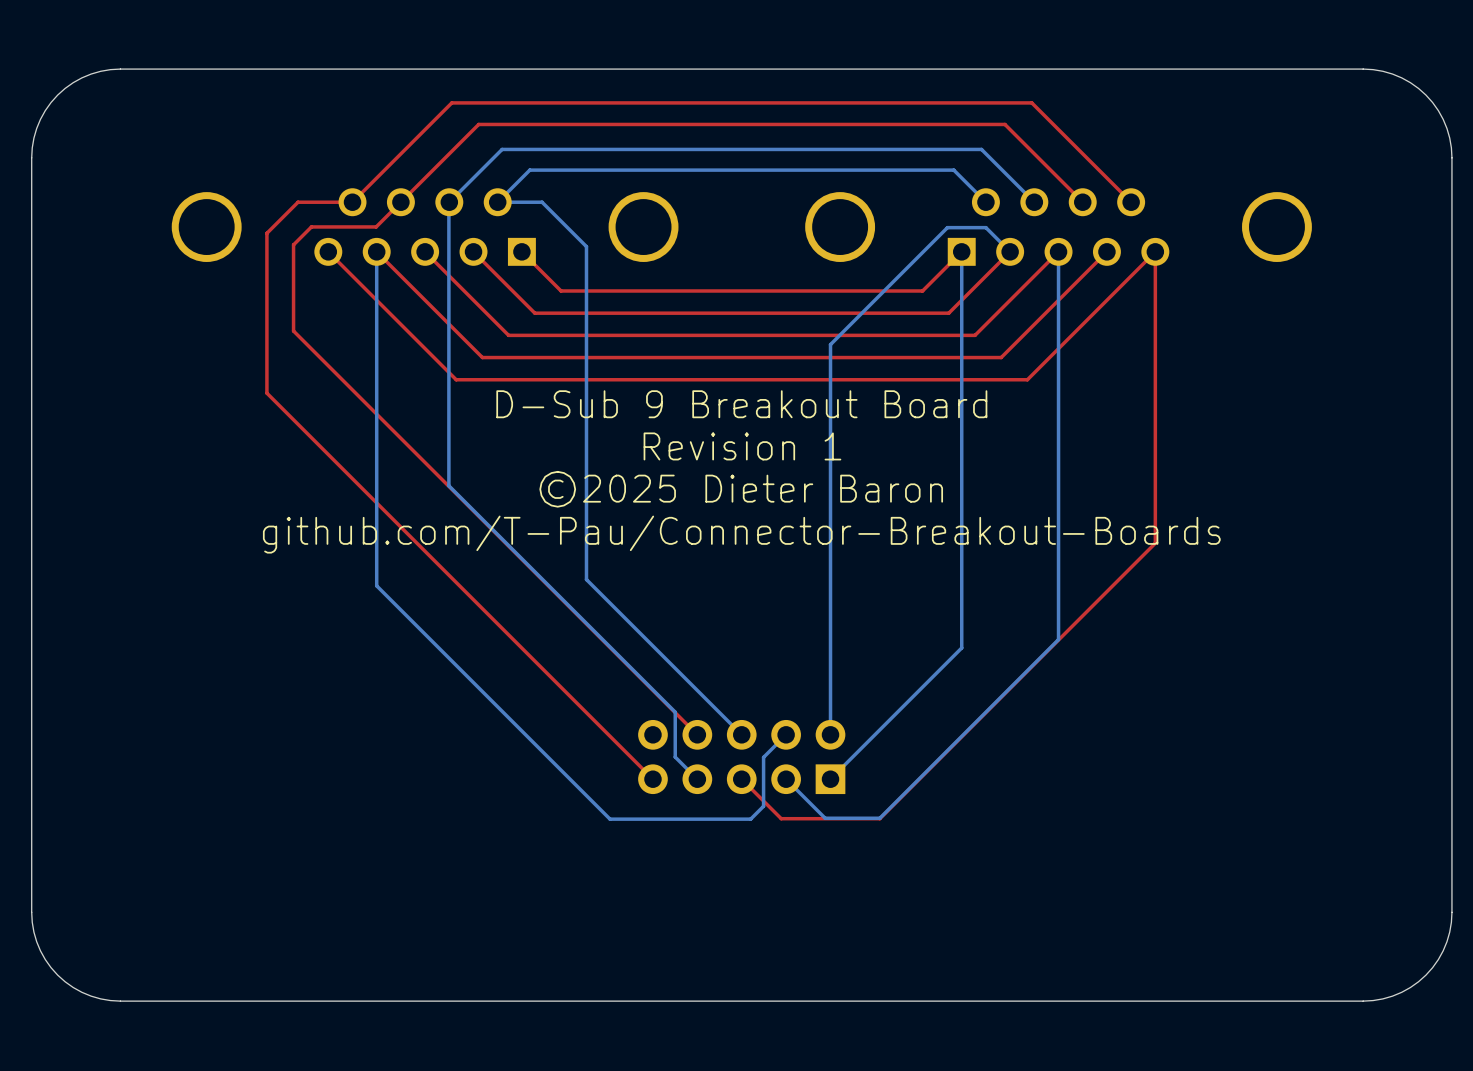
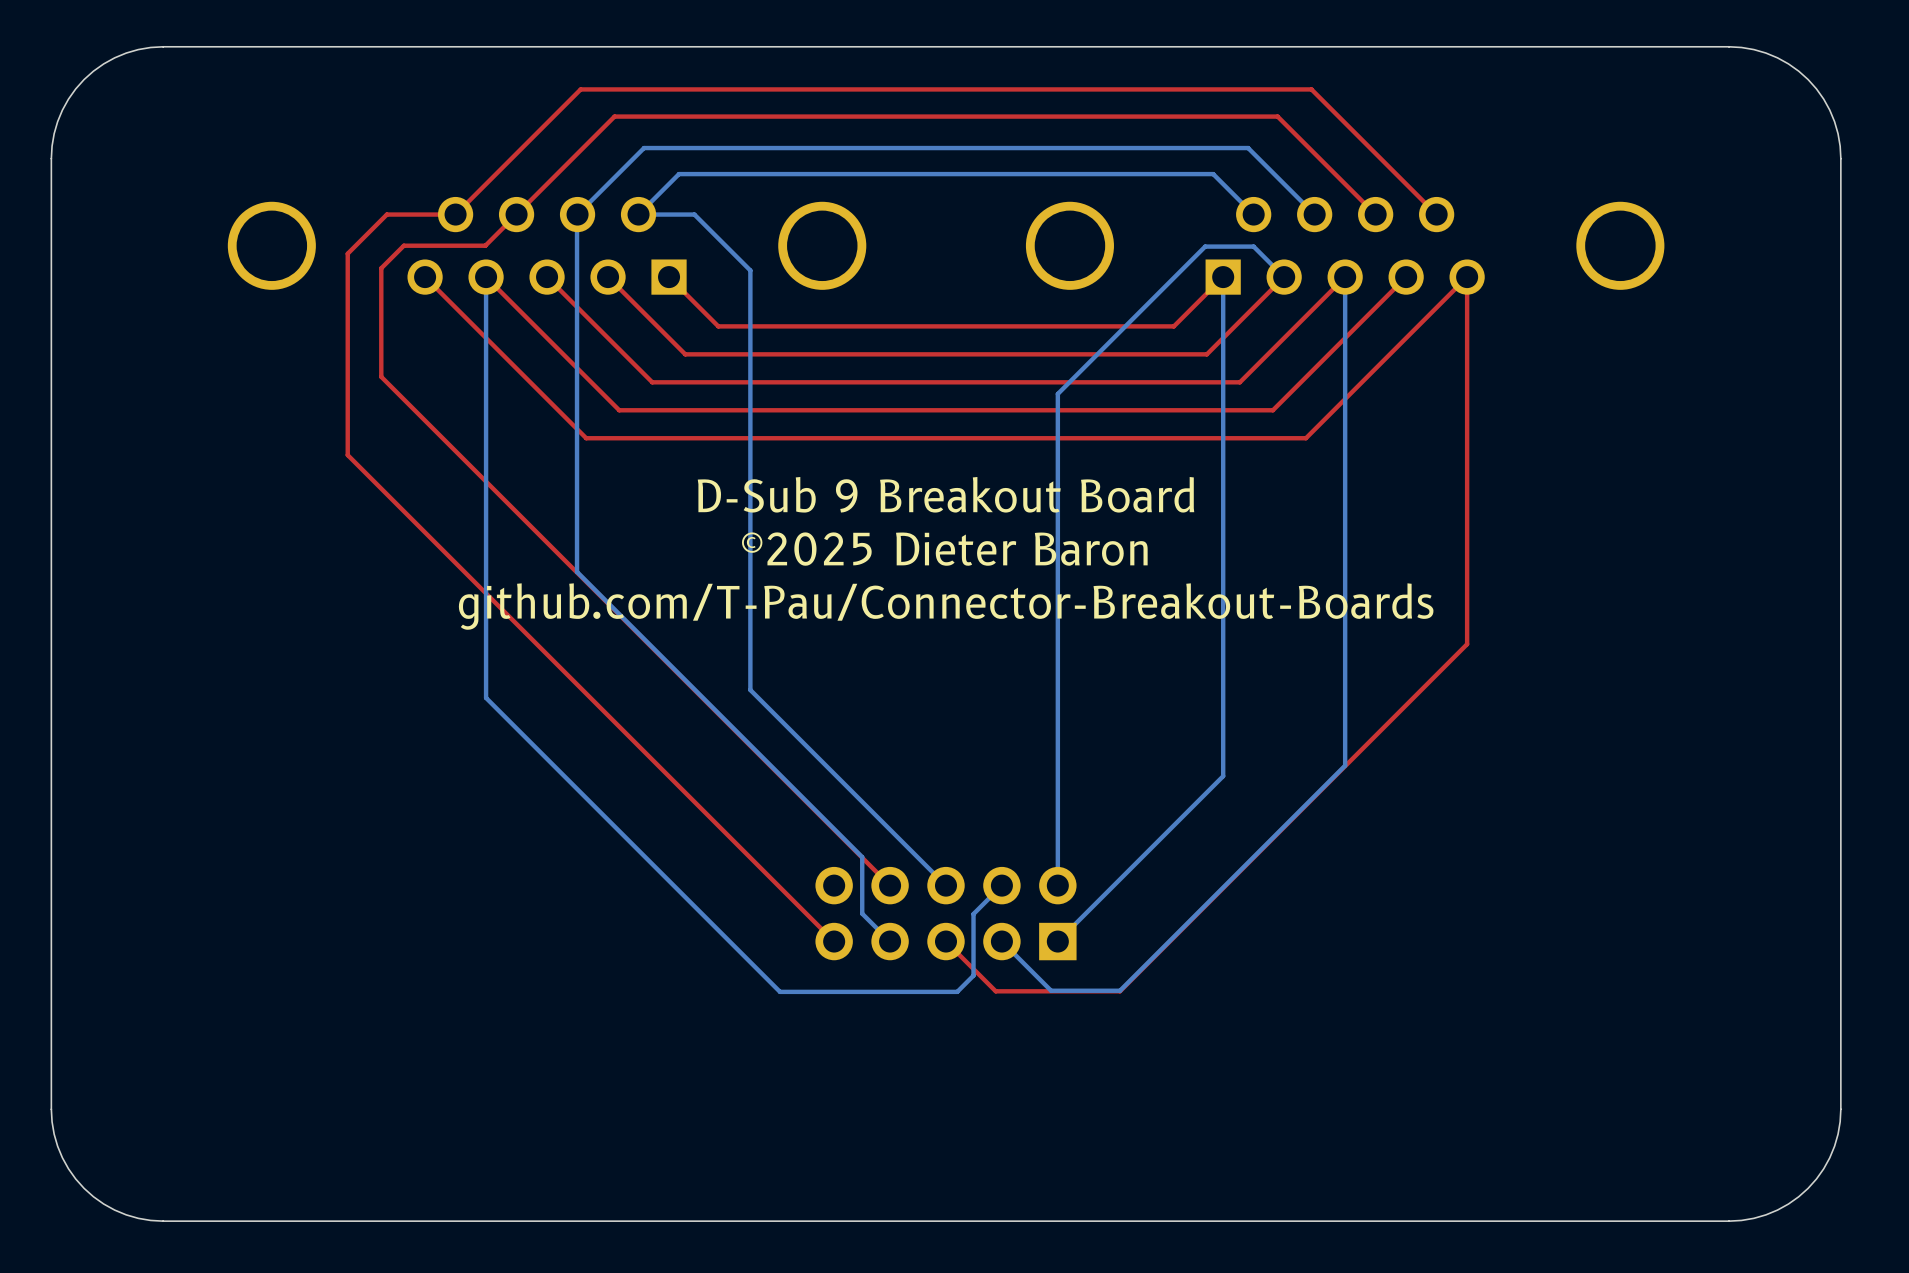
text position: D-Sub 9 Breakout Board (741, 404) -> D-Sub 9 Breakout Board (946, 494)
text: Revision 1 (742, 446) -> none
text position: ©2025 Dieter Baron (741, 489) -> ©2025 Dieter Baron (944, 549)
text position: github.com/T-Pau/Connector-Breakout-Boards (741, 534) -> github.com/T-Pau/Connector-Breakout-Boards (946, 606)

